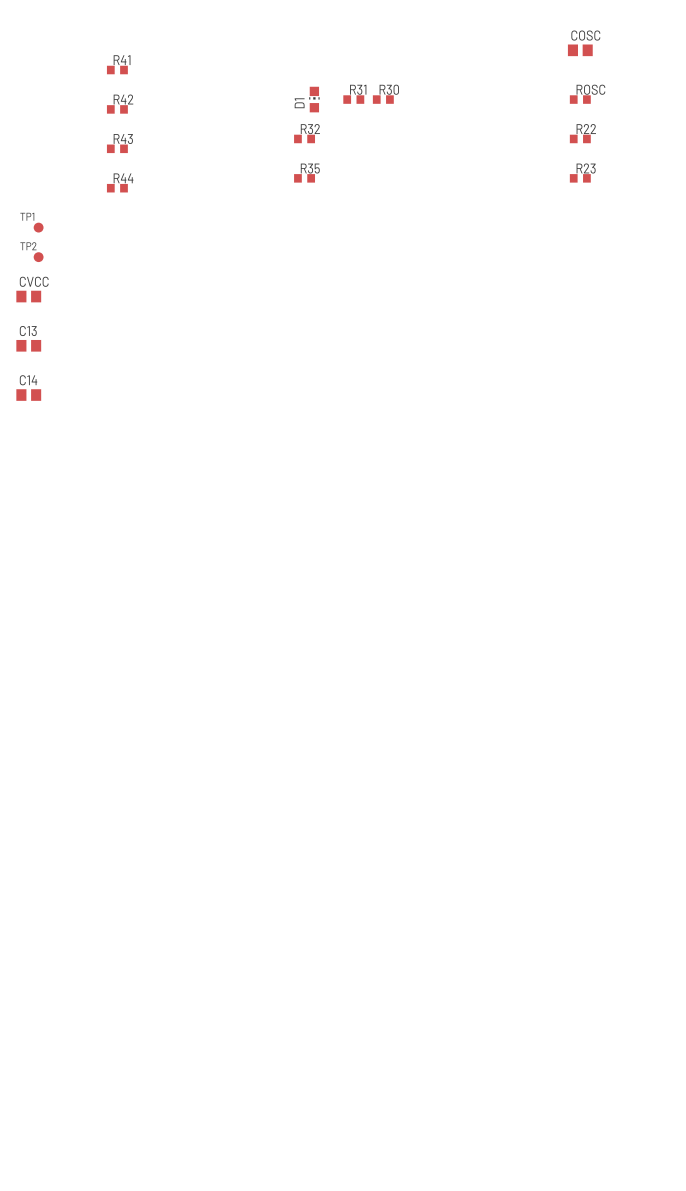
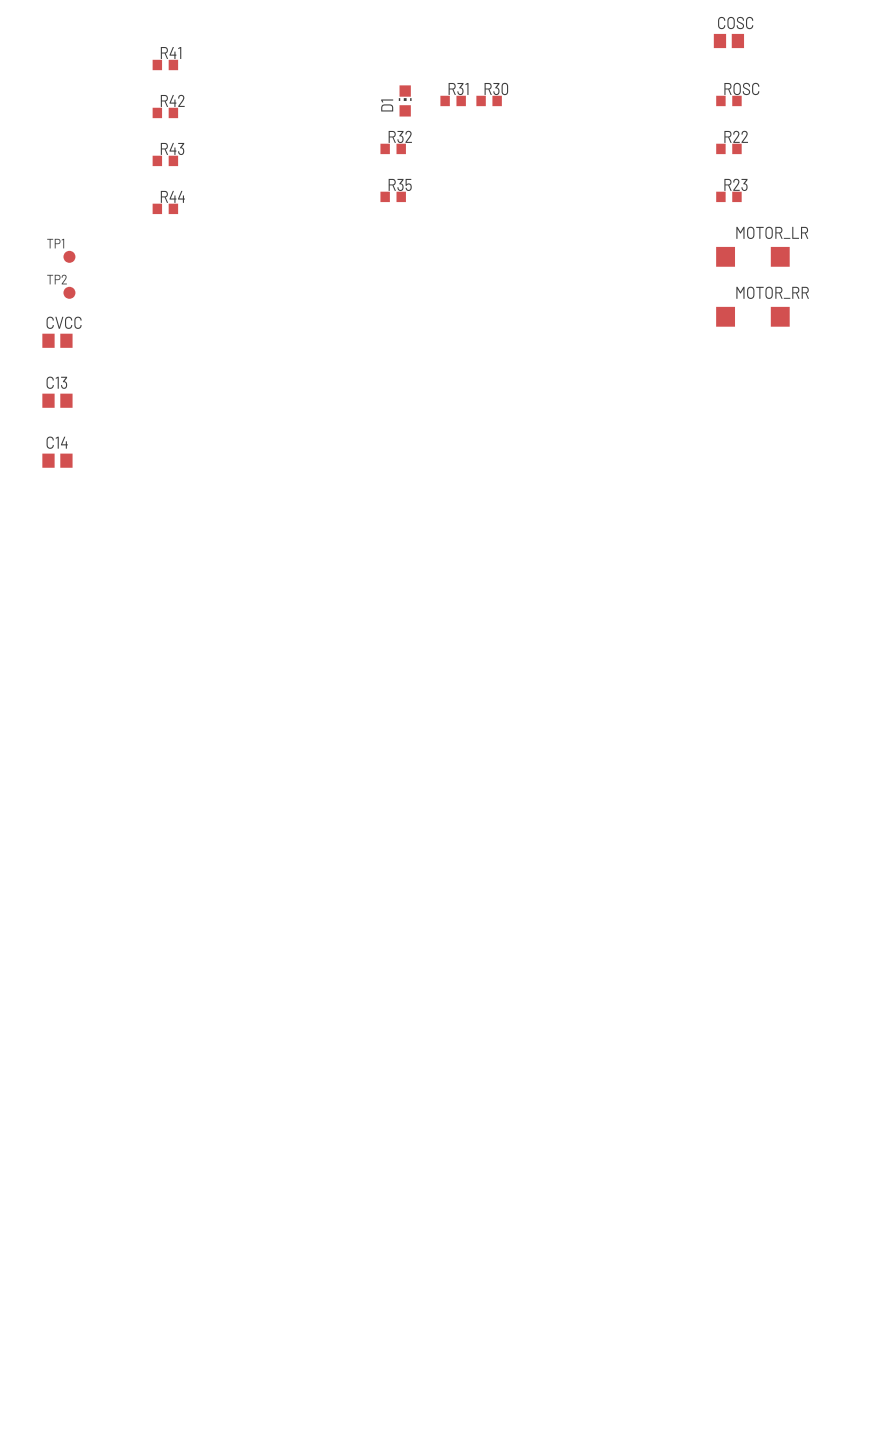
MOTOR_LR: none -> (752, 256)
MOTOR_RR: none -> (752, 316)

